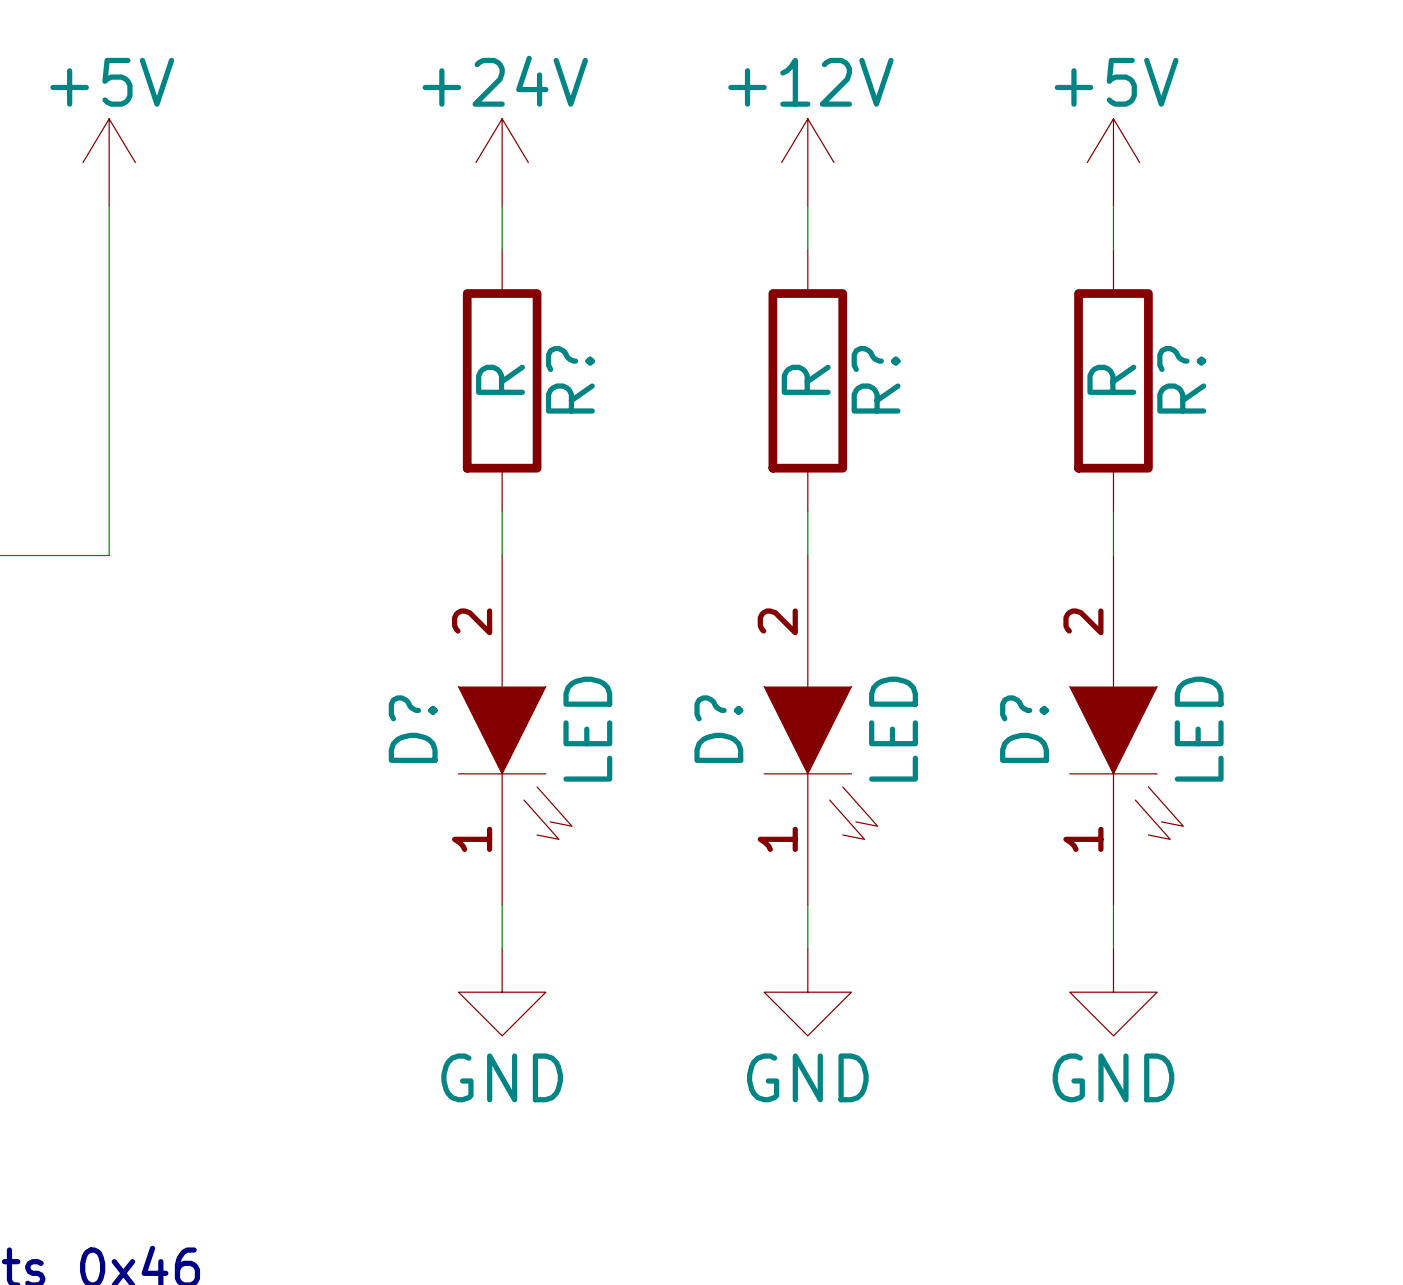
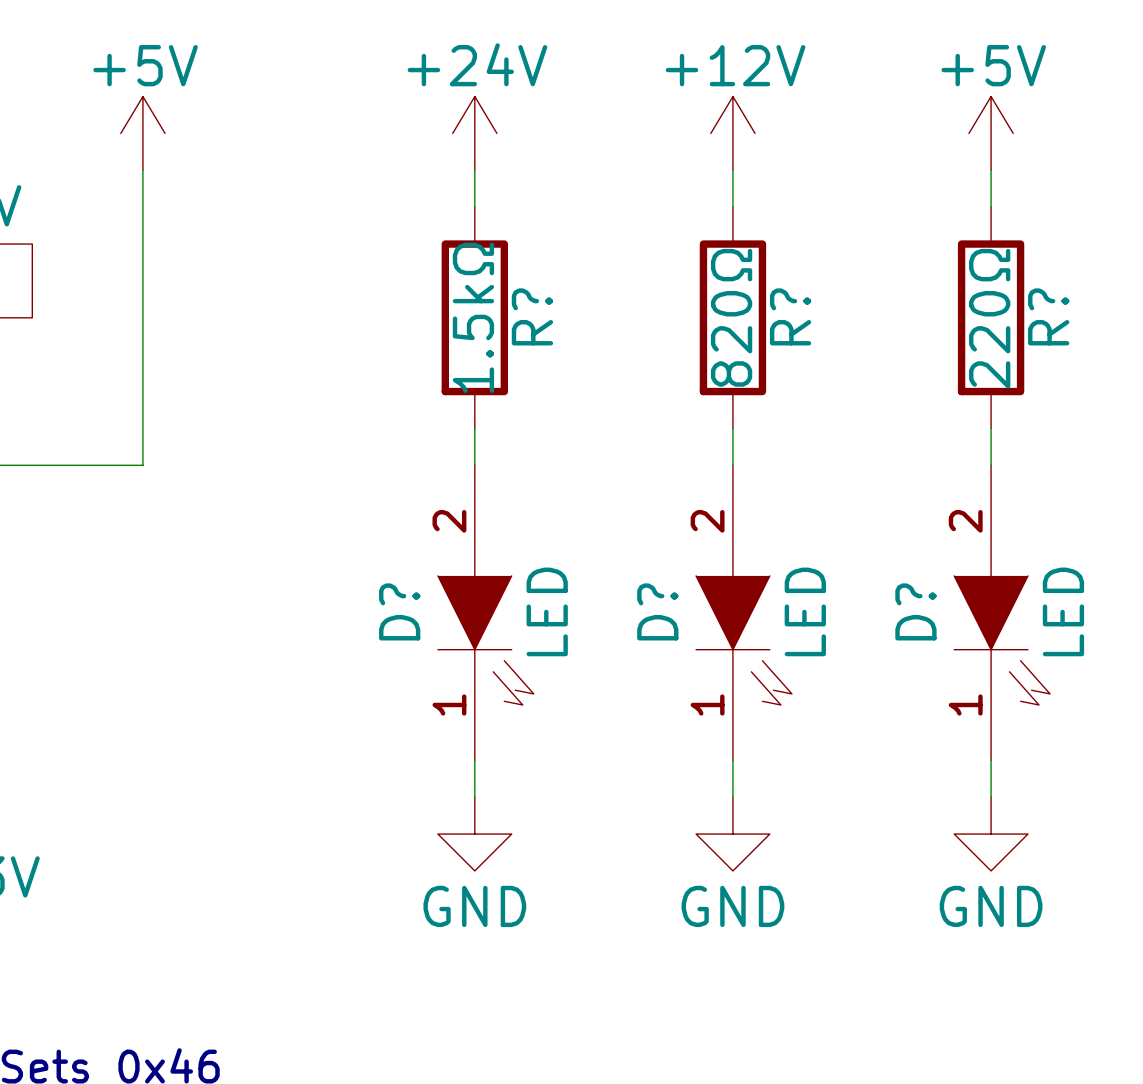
R? value: R (500, 379) -> 1.5kΩ (473, 317)
R? value: R (806, 379) -> 820Ω (731, 317)
R? value: R (1111, 379) -> 220Ω (989, 318)

